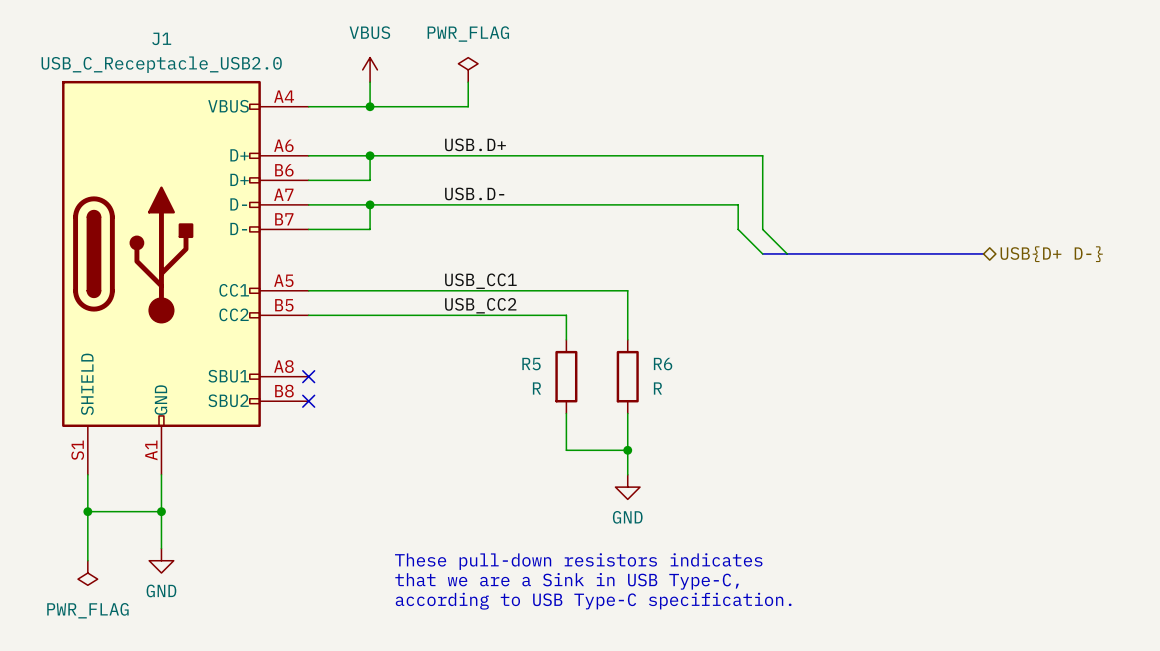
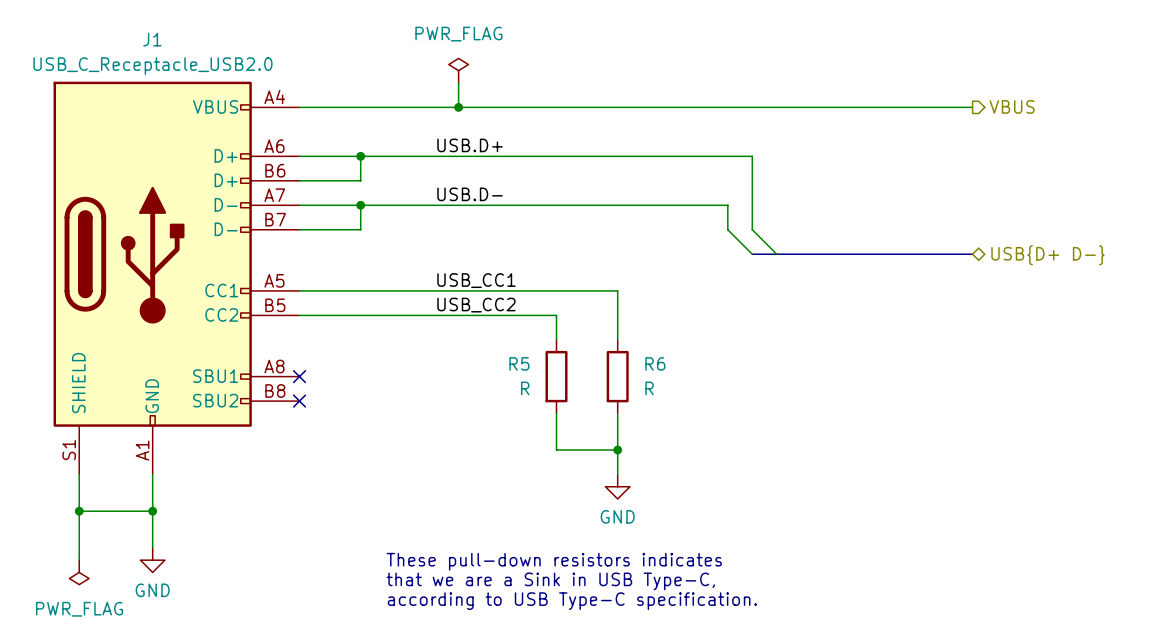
power symbol: VBUS (370, 69) -> none
wire: (370, 82) (370, 106) -> none
junction: (370, 106) -> none
wire: none -> (458, 107) (972, 107)
junction: none -> (458, 107)
hierarchical label: none -> VBUS (1012, 106)

